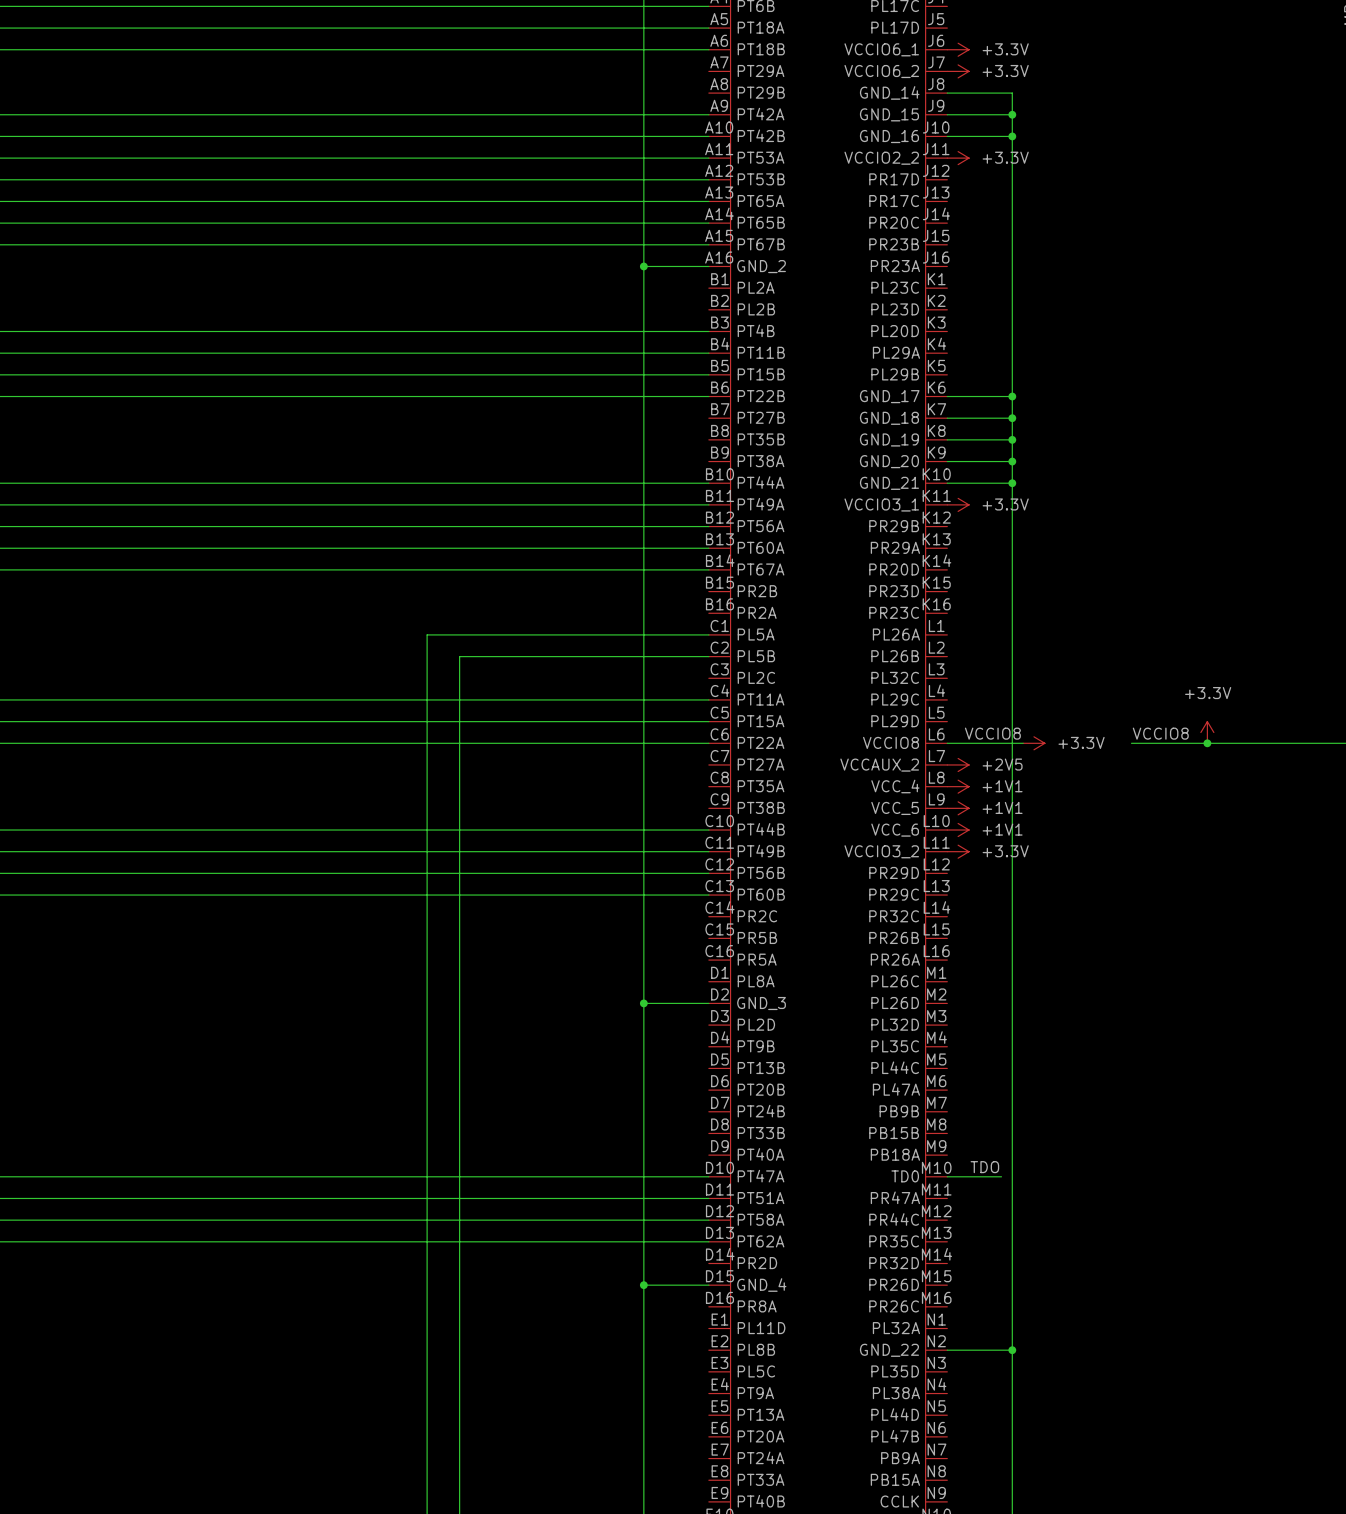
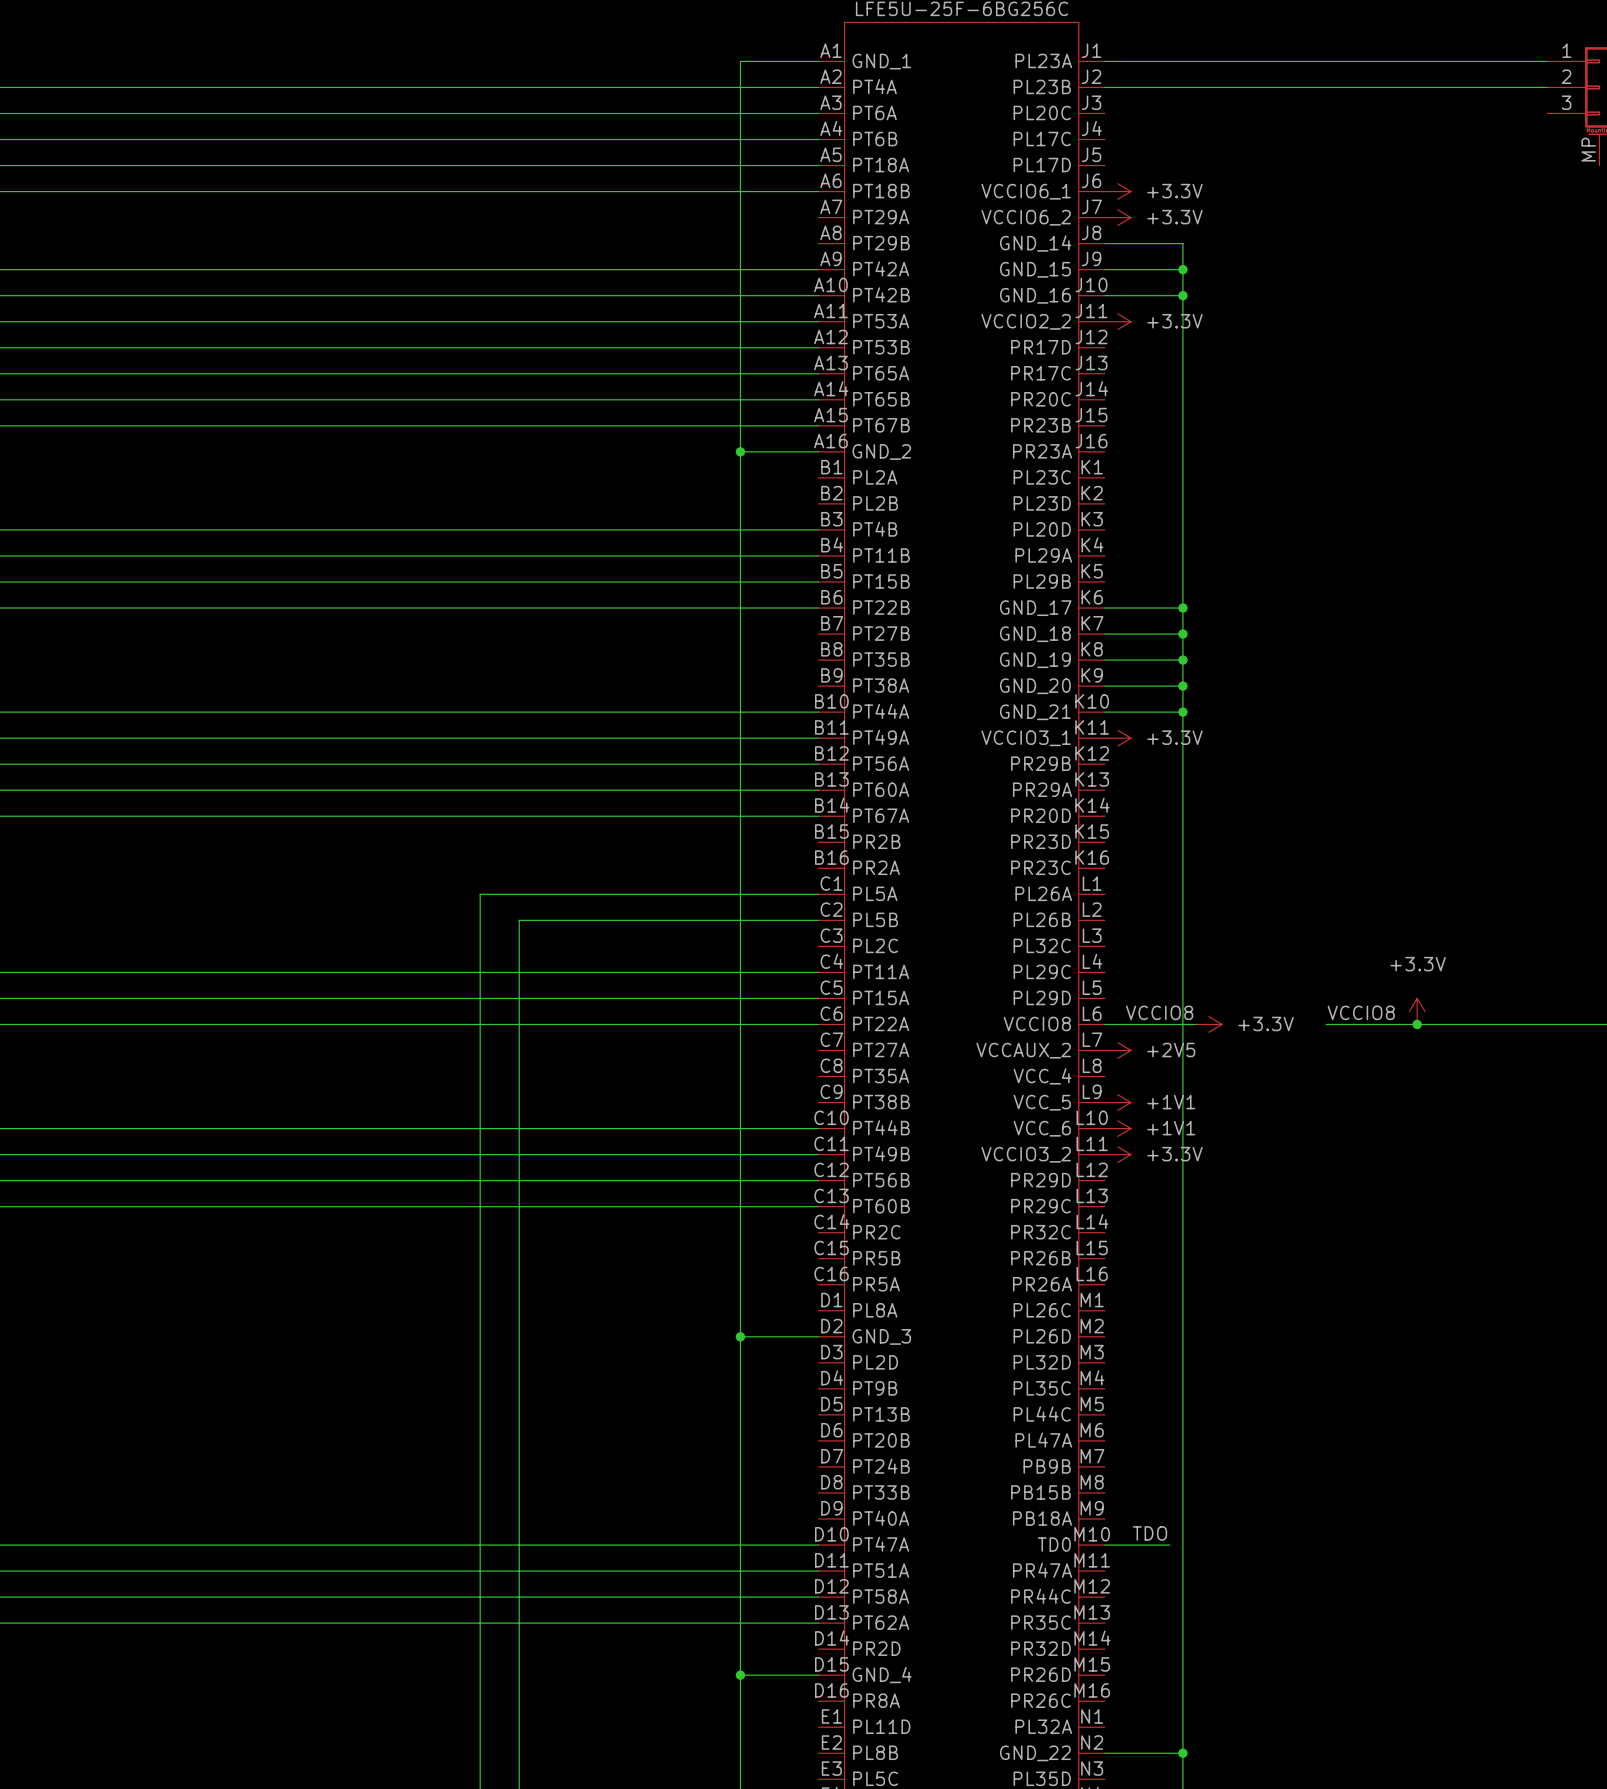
power symbol: +1V1 (958, 786) -> none

